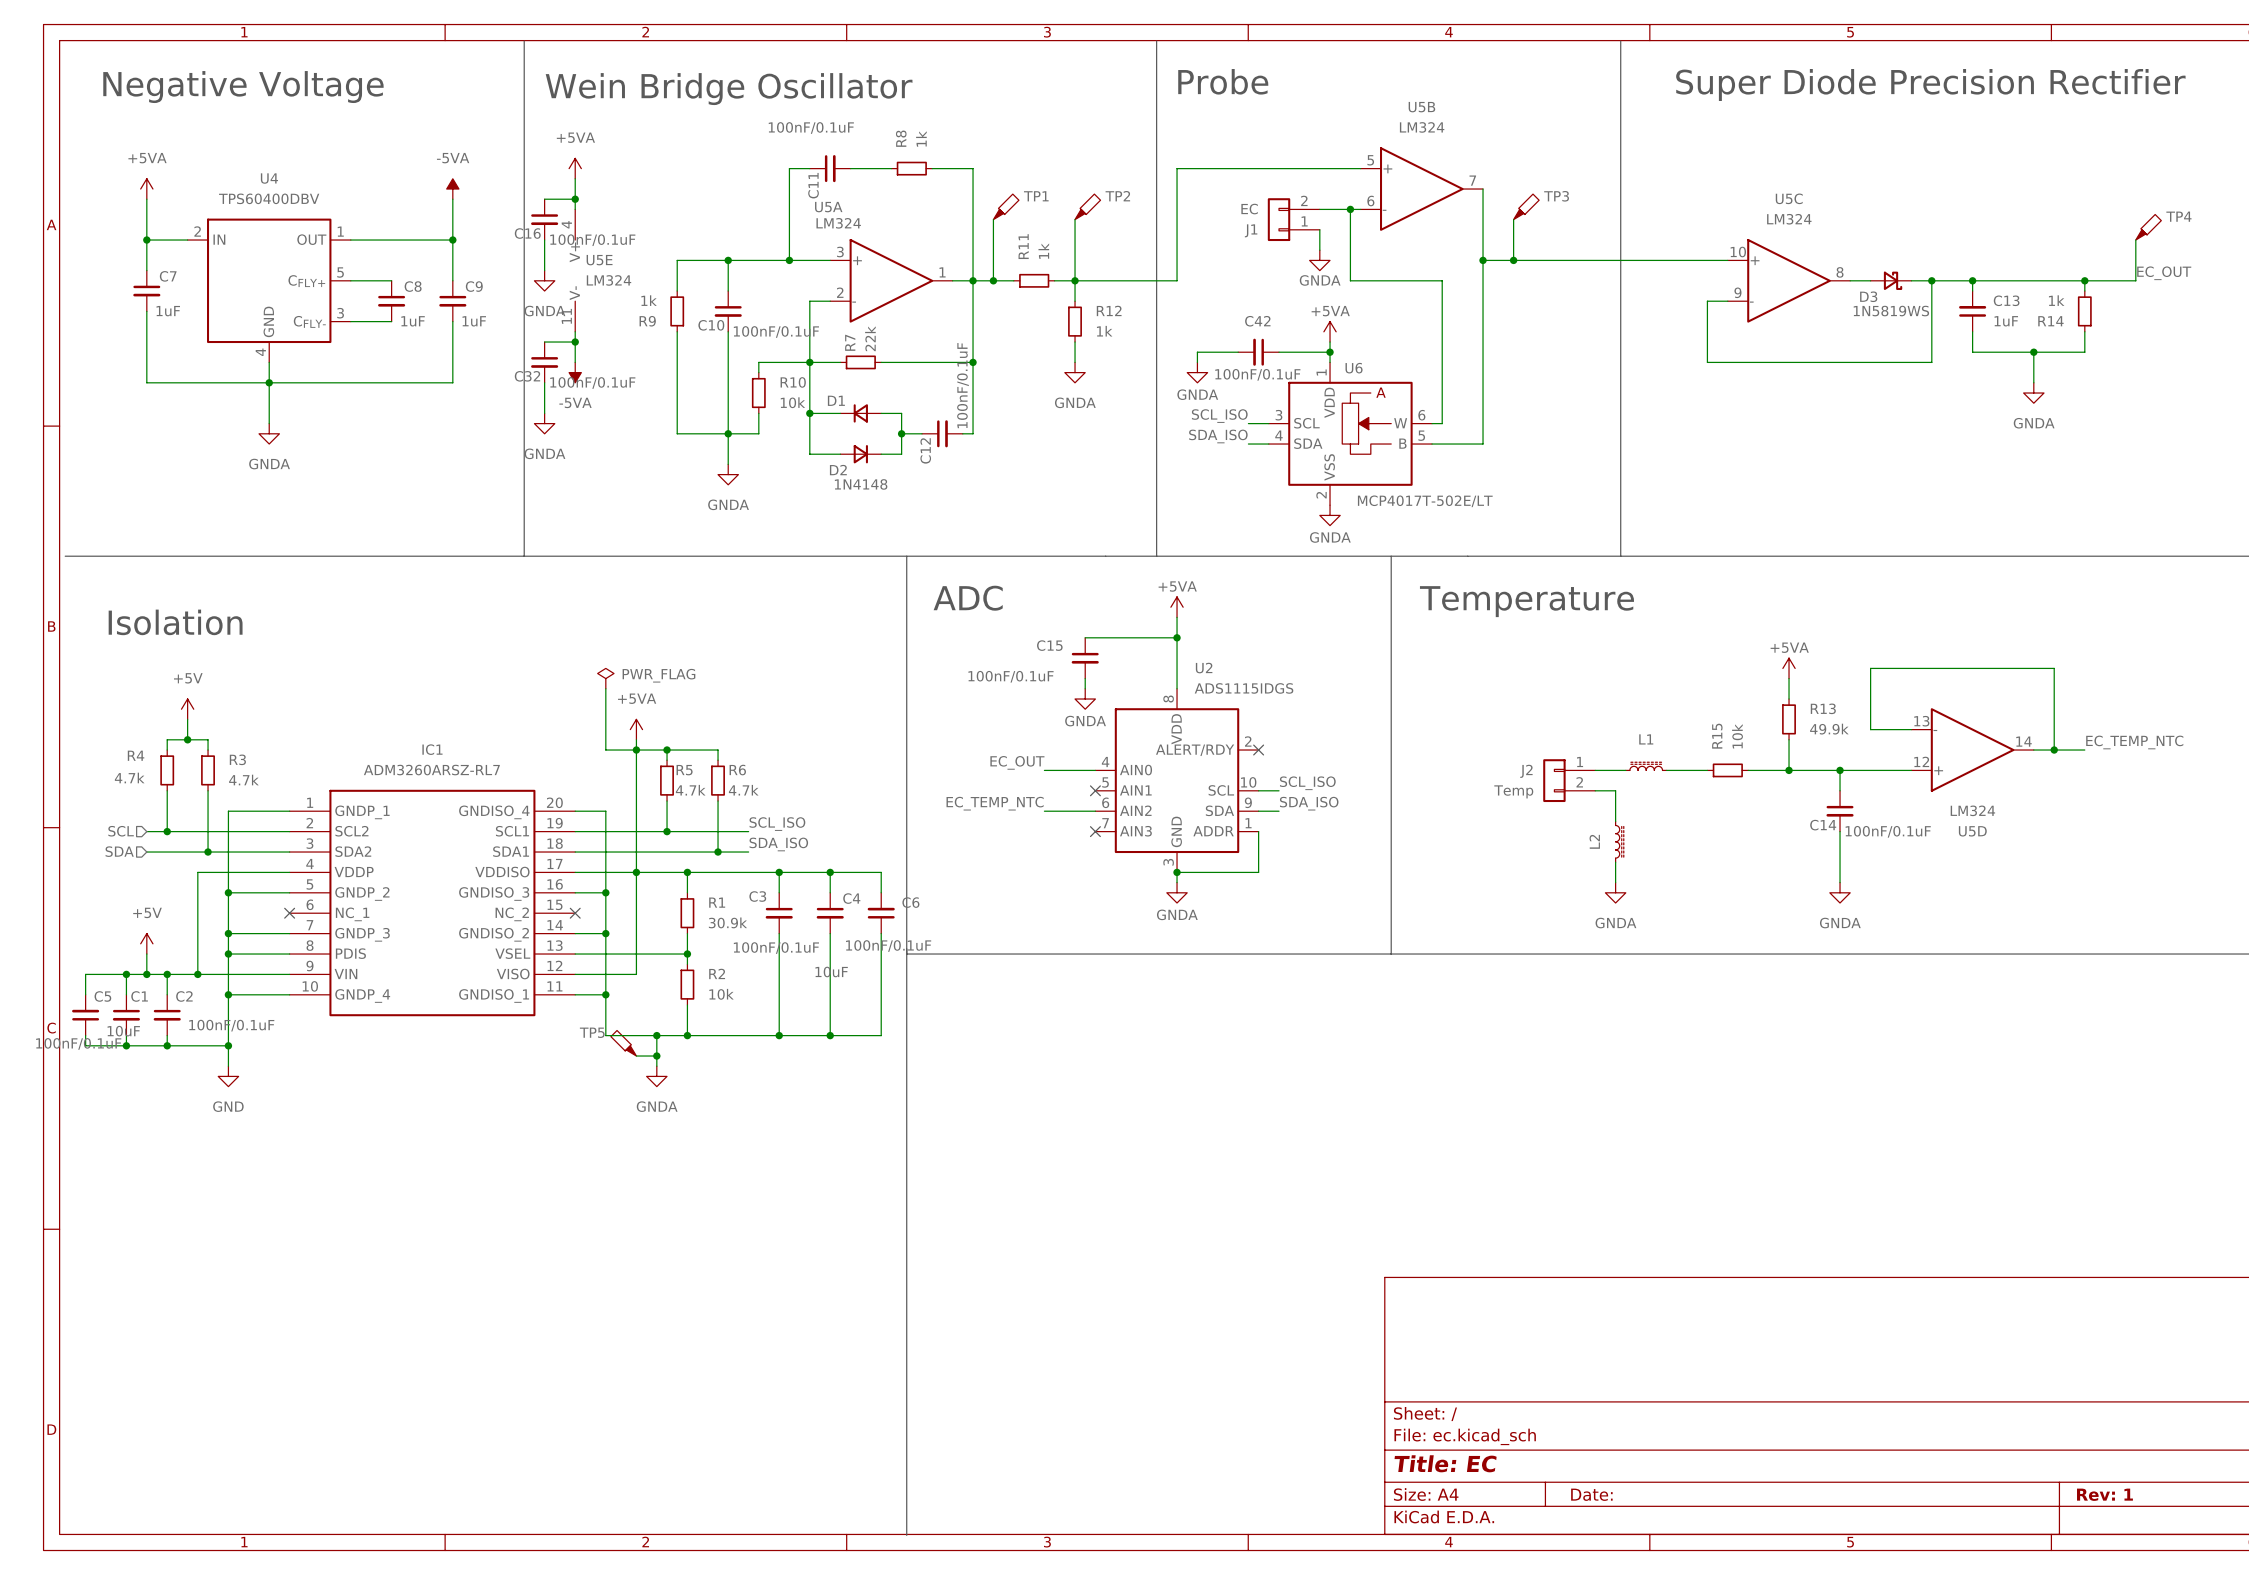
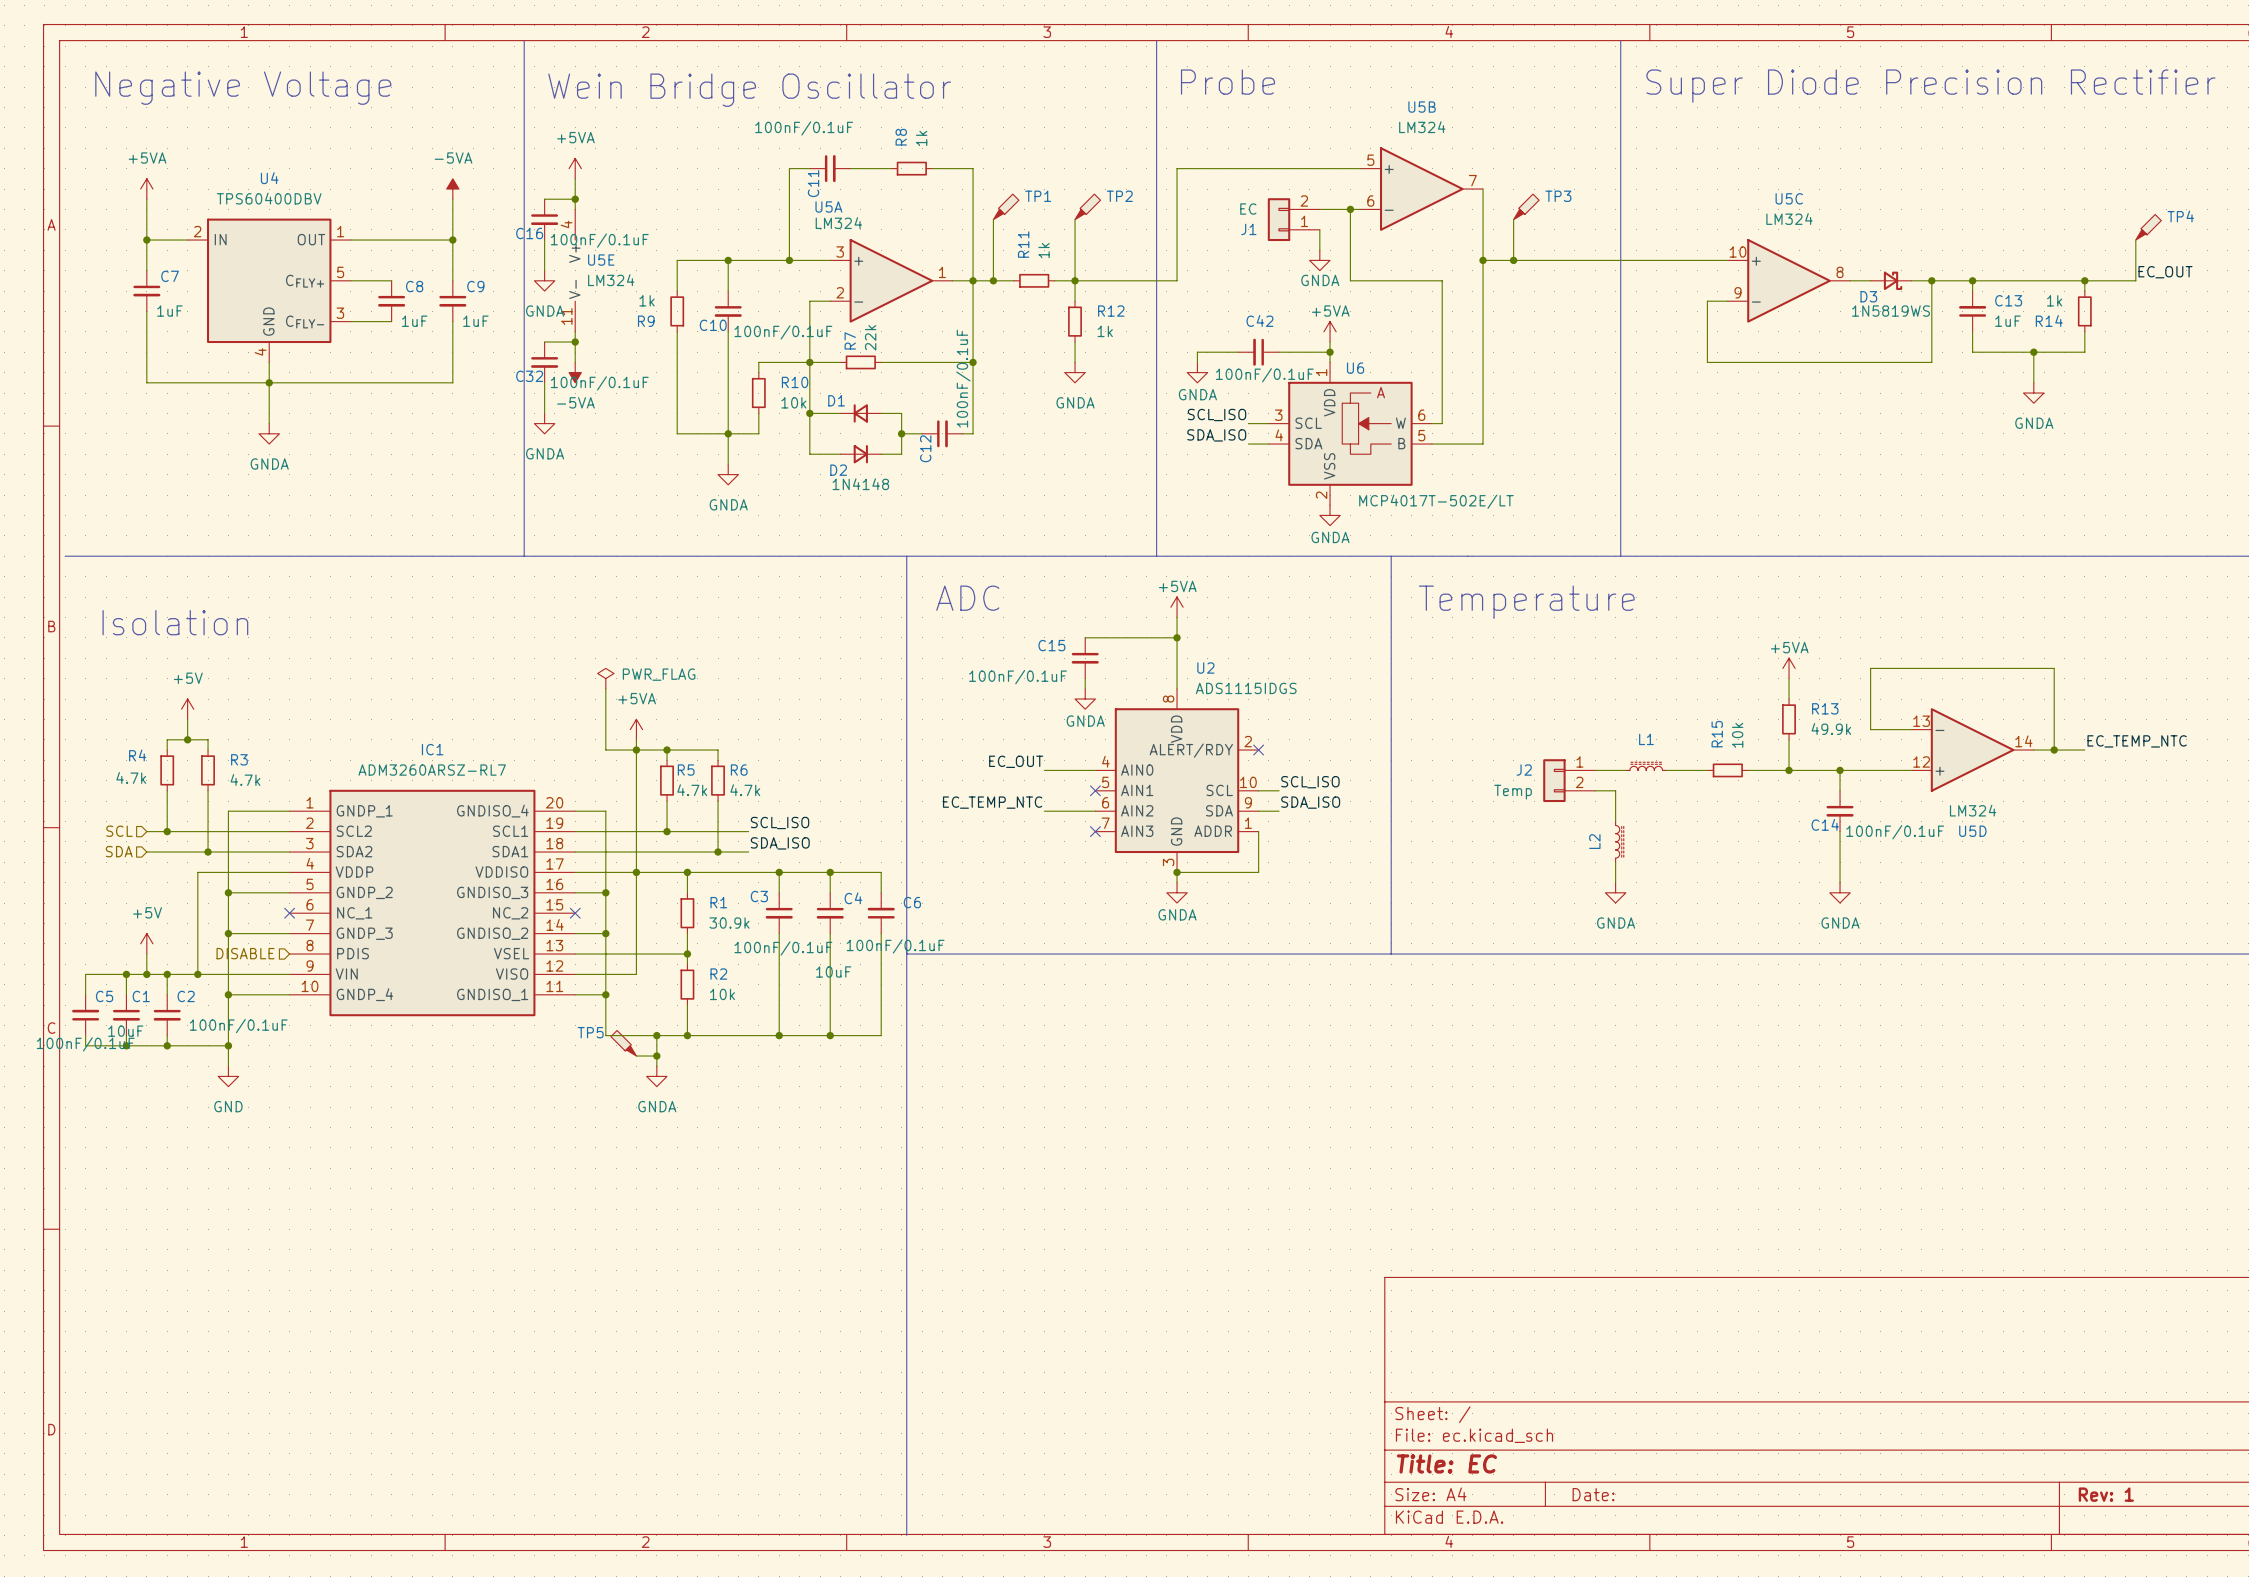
hierarchical label: none -> DISABLE (245, 953)
wire: (228, 954) (289, 954) -> none
junction: (228, 954) -> none

